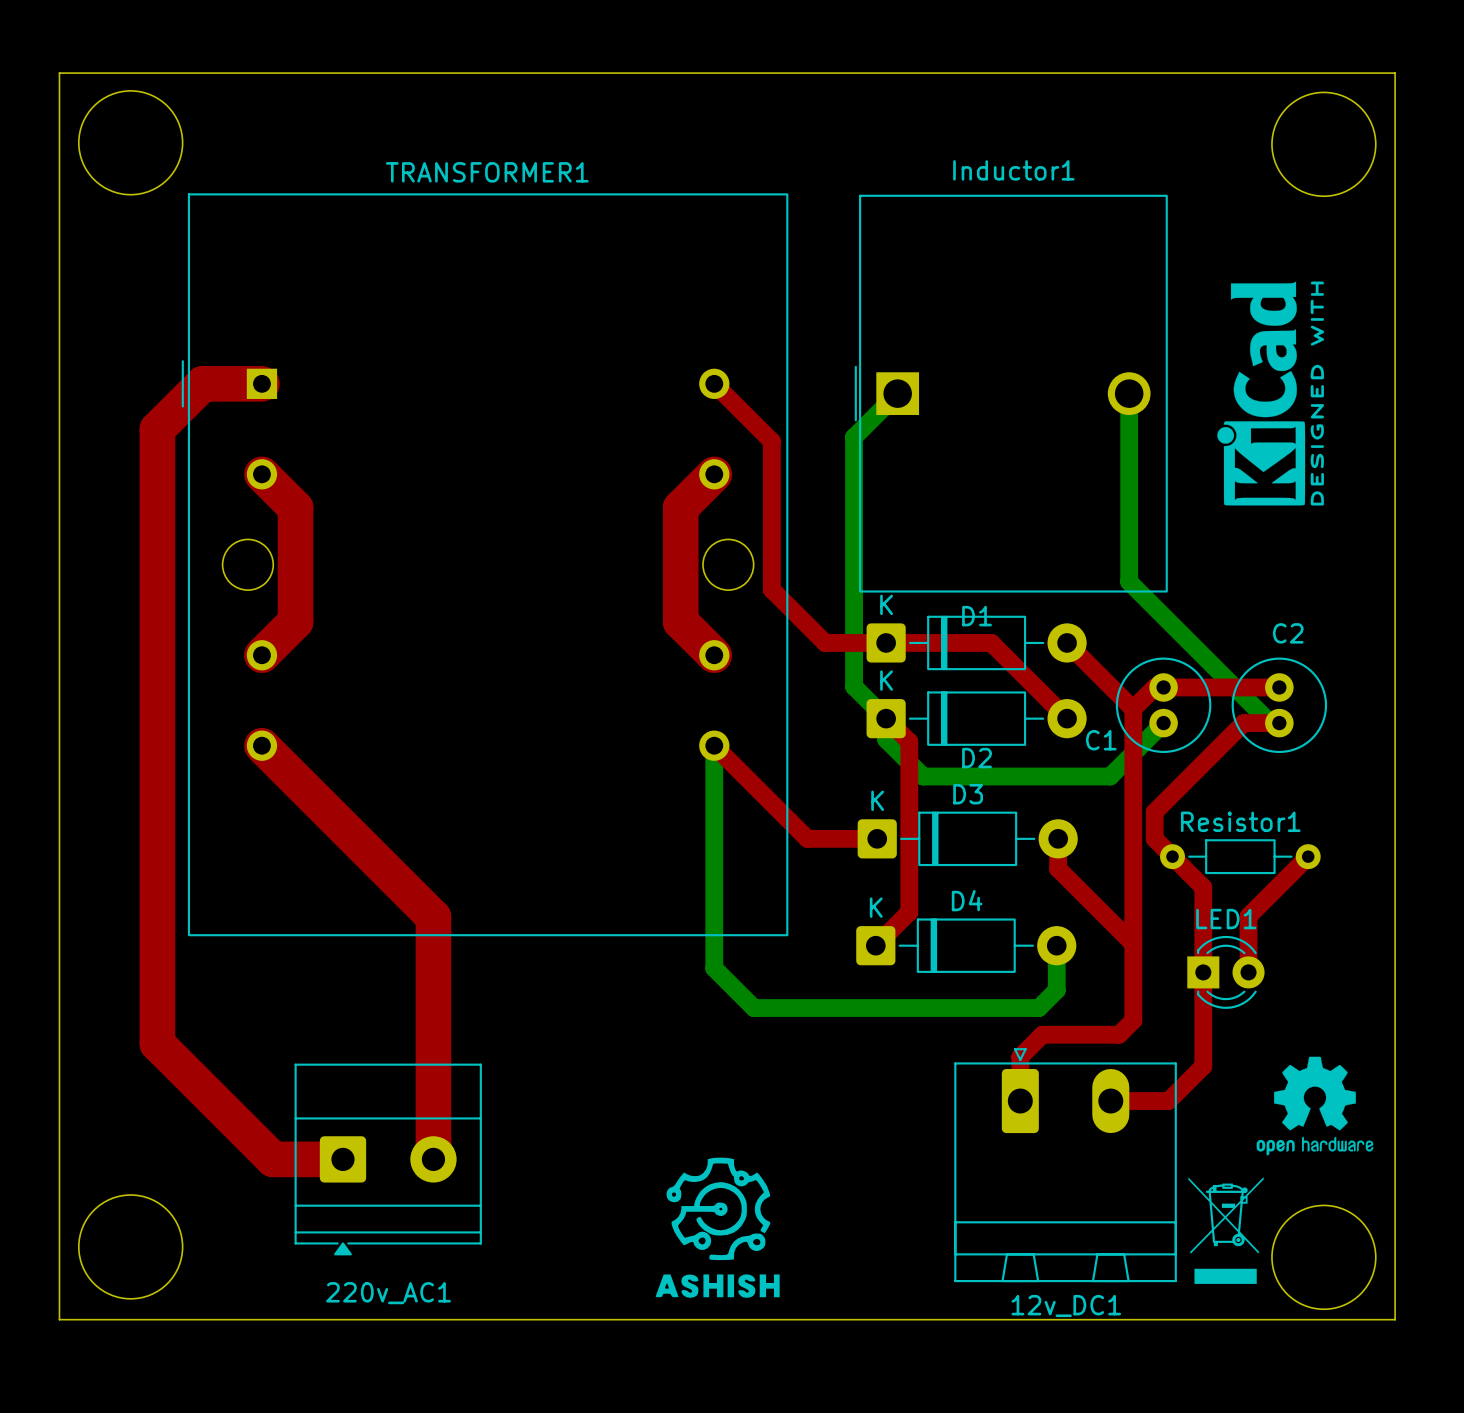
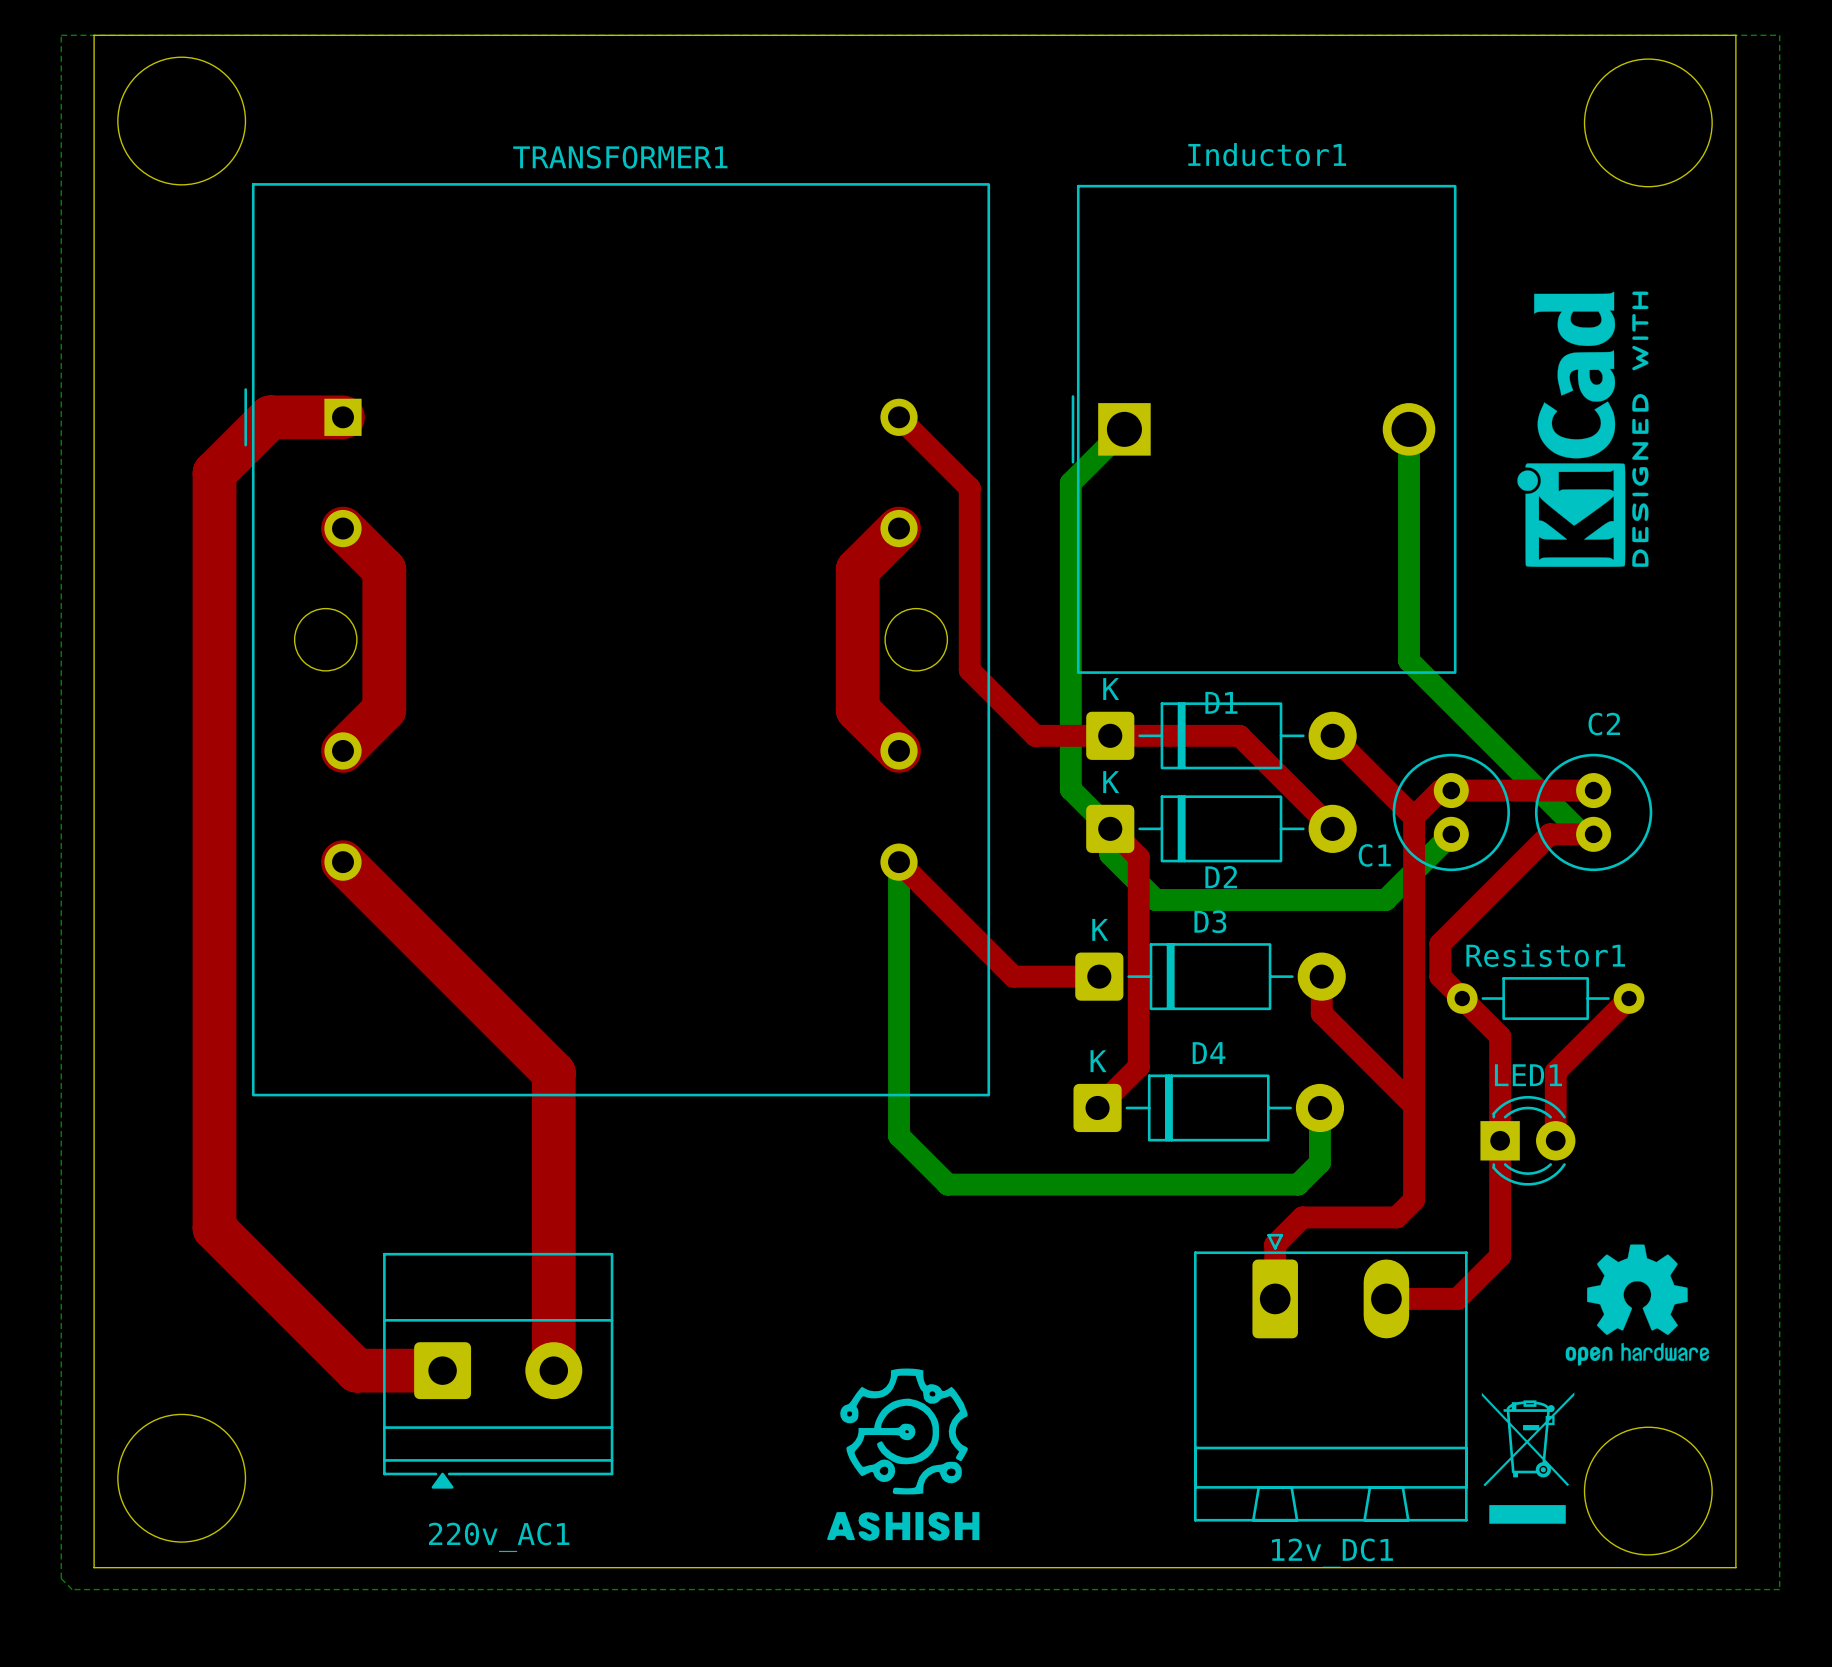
bottom zone outline: none -> (61, 35) (1779, 35) (1779, 1589) (72, 1589) (61, 1578) (61, 35)

